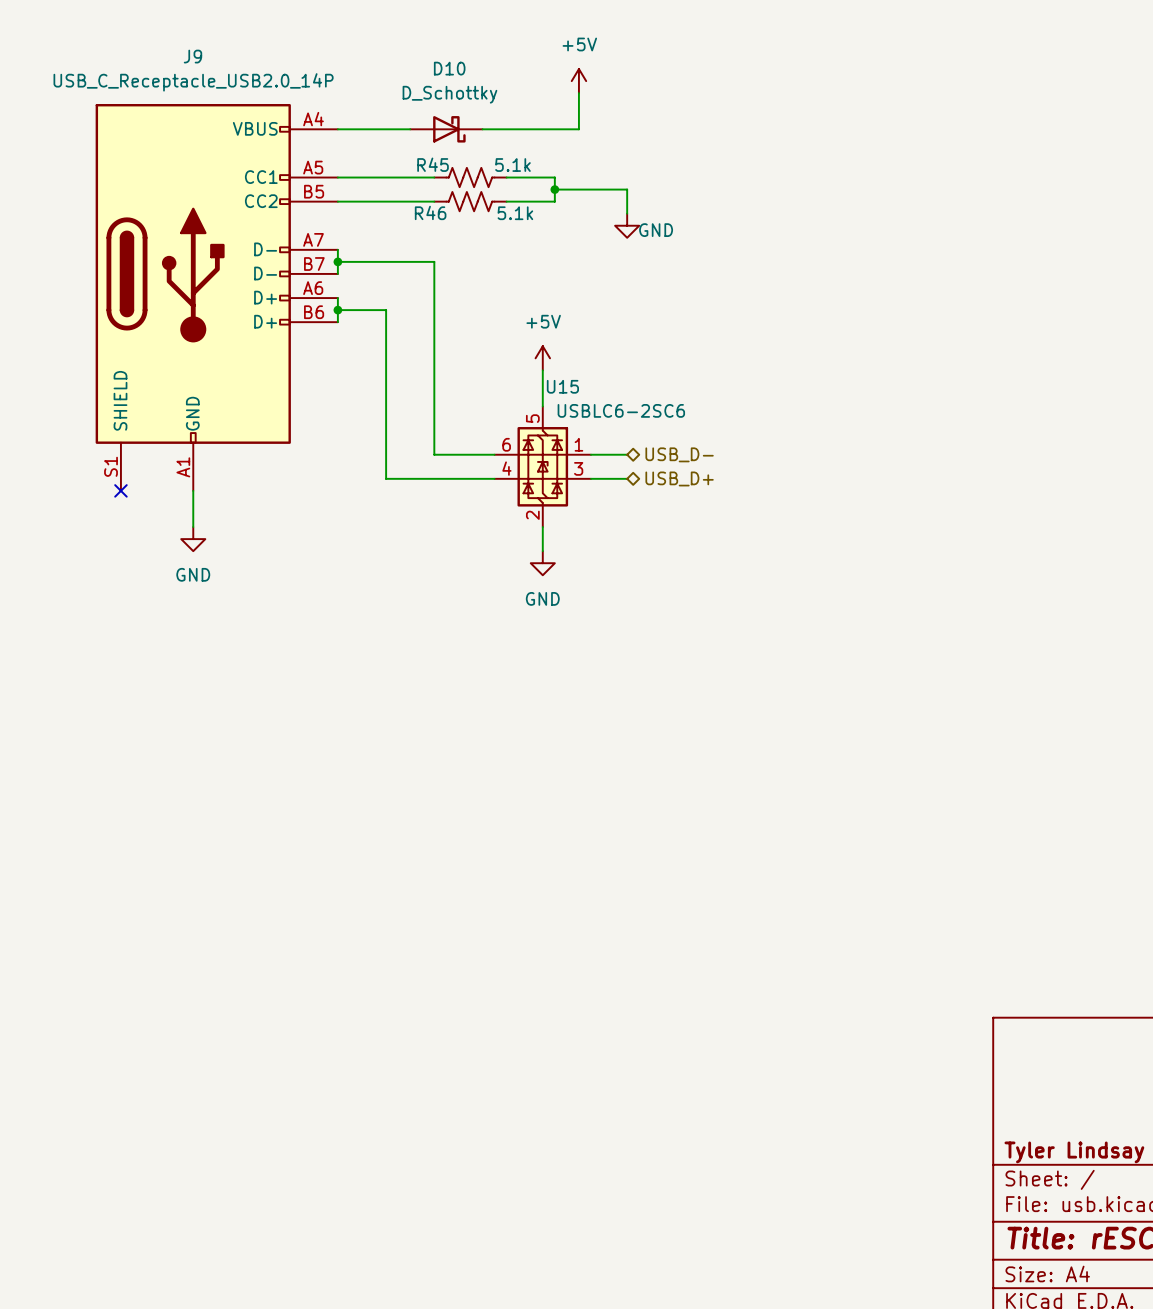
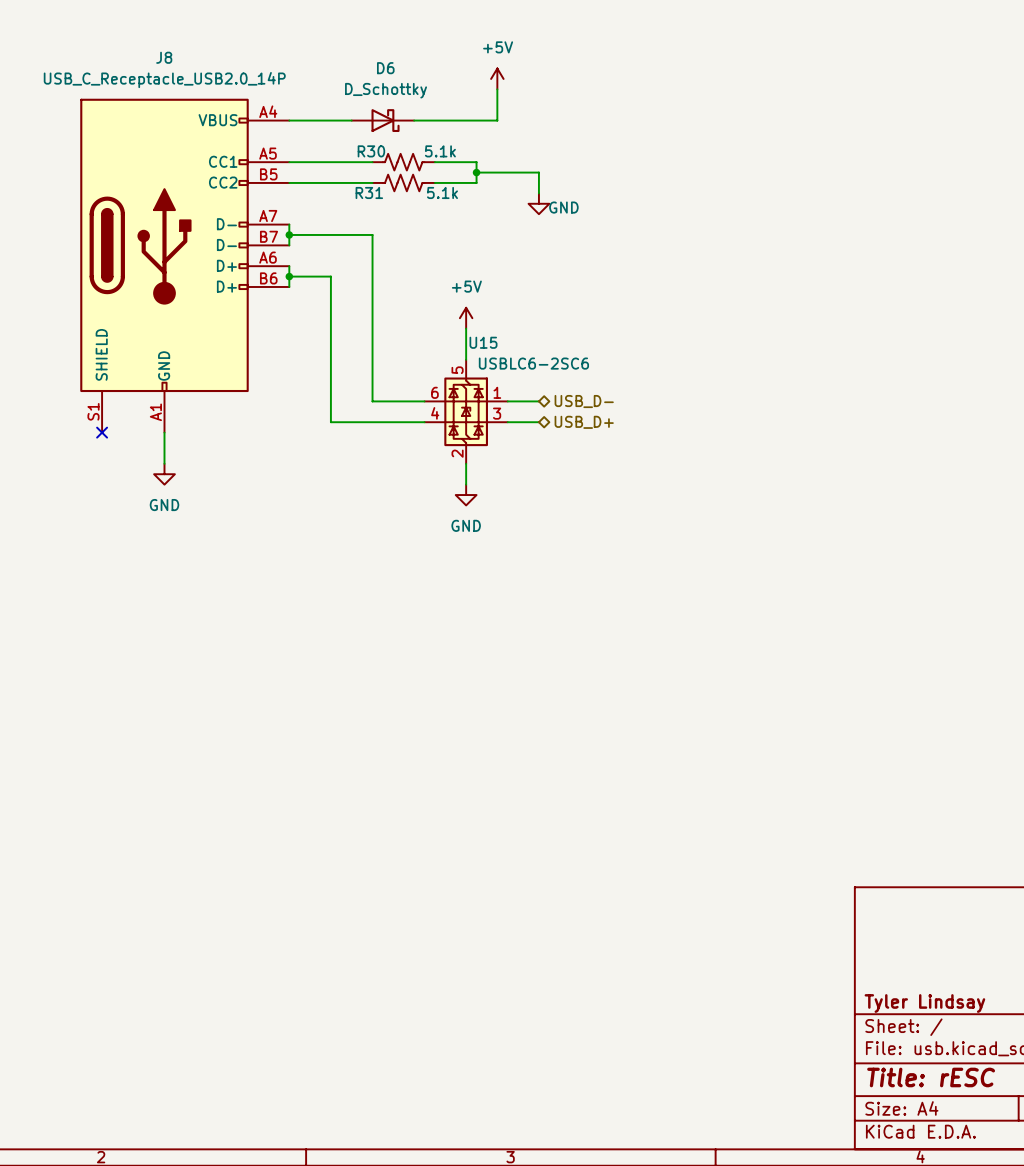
J9 name: J9 (192, 56) -> J8 (164, 57)
D10 name: D10 (449, 68) -> D6 (385, 68)
R45 name: R45 (433, 164) -> R30 (371, 151)
R46 name: R46 (430, 212) -> R31 (369, 192)

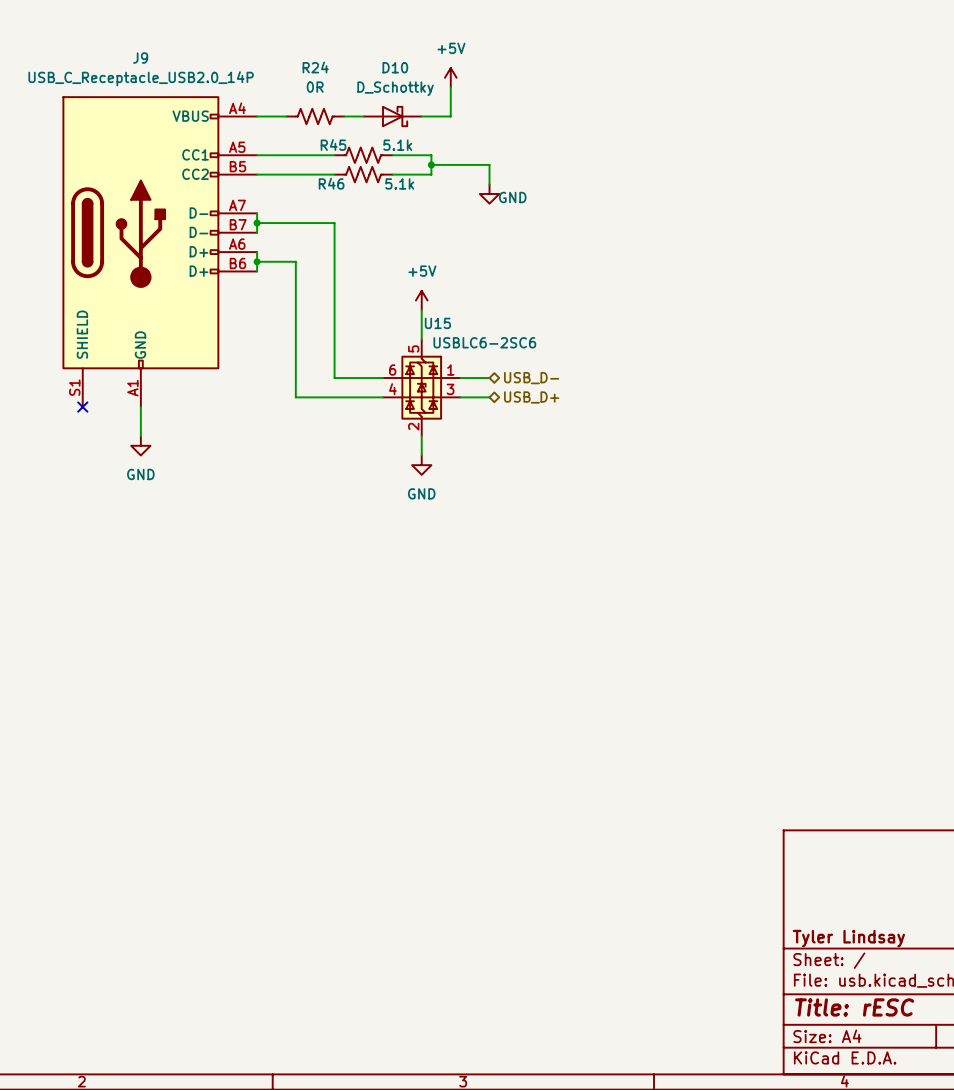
J8 name: J8 (164, 57) -> J9 (140, 58)
R24: none -> 0R (315, 116)
D6: D_Schottky (382, 120) -> none
D10: none -> D_Schottky (392, 116)
R30 name: R30 (371, 151) -> R45 (333, 144)
R31 name: R31 (369, 192) -> R46 (331, 183)

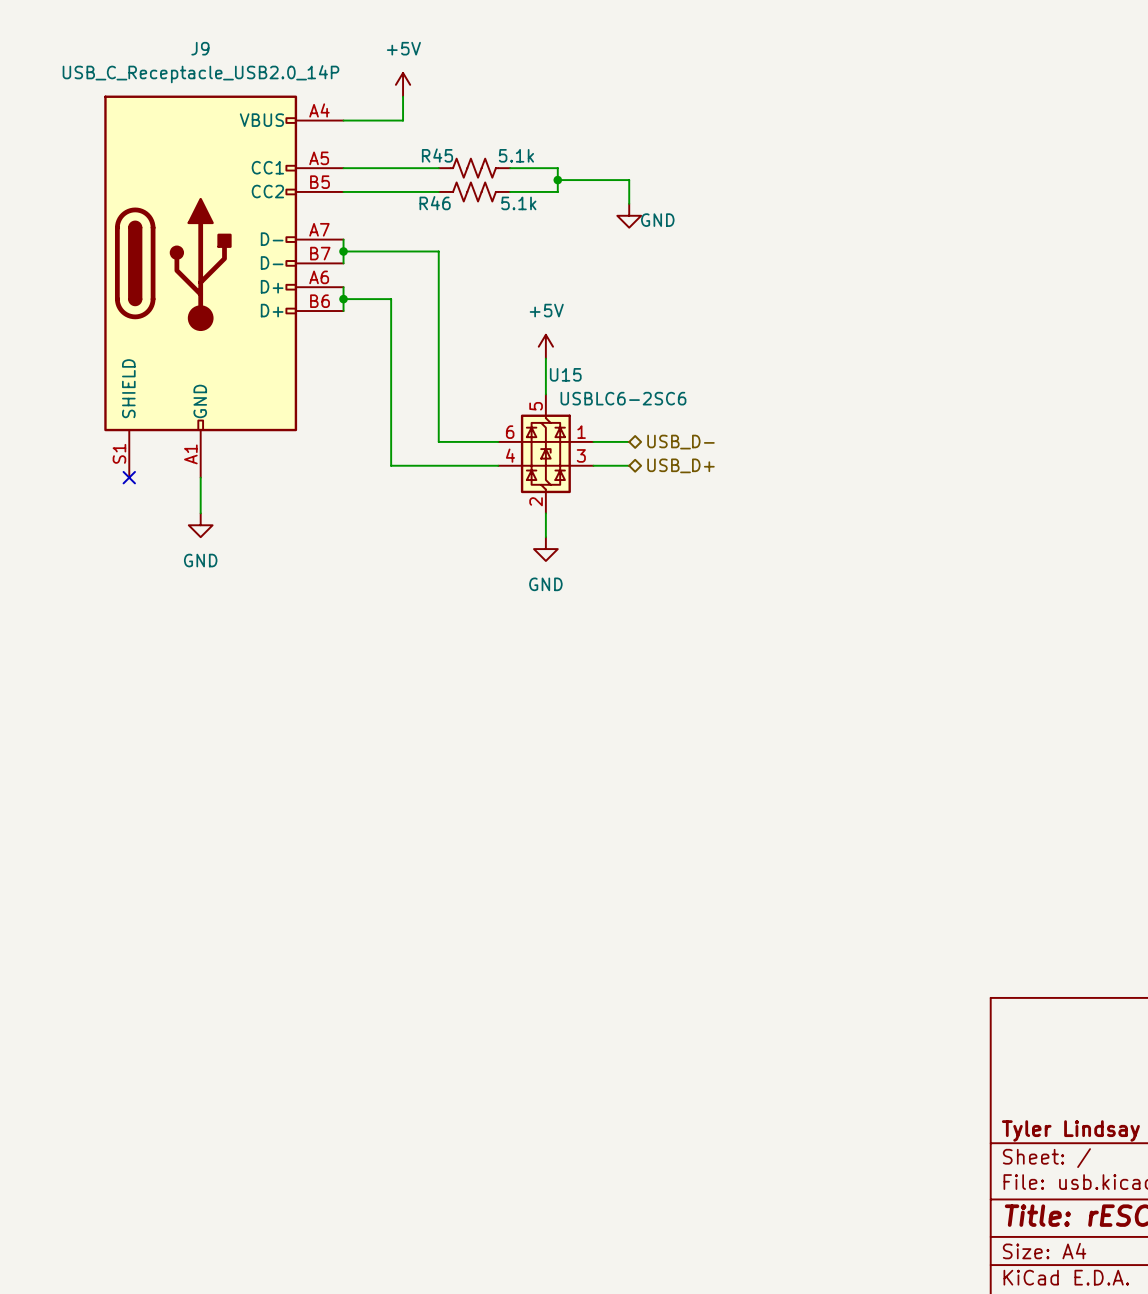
power symbol position: +5V (450, 77) -> +5V (403, 84)
wire: (450, 87) (450, 116) (421, 116) -> none
wire: none -> (403, 96) (403, 120) (379, 120)
R24: 0R (315, 116) -> none
wire: (344, 116) (363, 116) -> none
D10: D_Schottky (392, 116) -> none

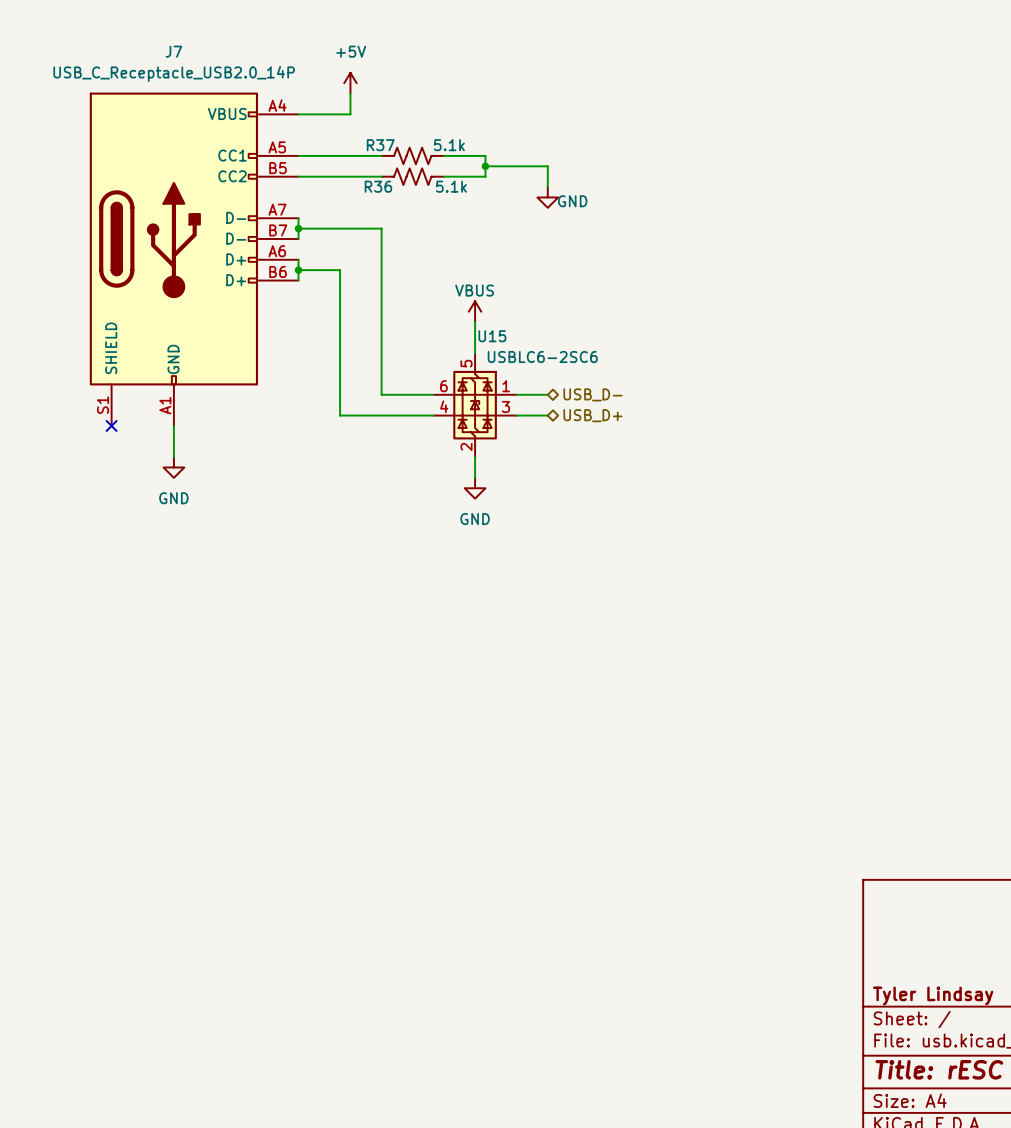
J9 name: J9 (200, 48) -> J7 (173, 51)
R45 name: R45 (437, 155) -> R37 (380, 145)
R46 name: R46 (435, 203) -> R36 (378, 186)
power symbol: +5V (545, 346) -> VBUS (475, 311)

